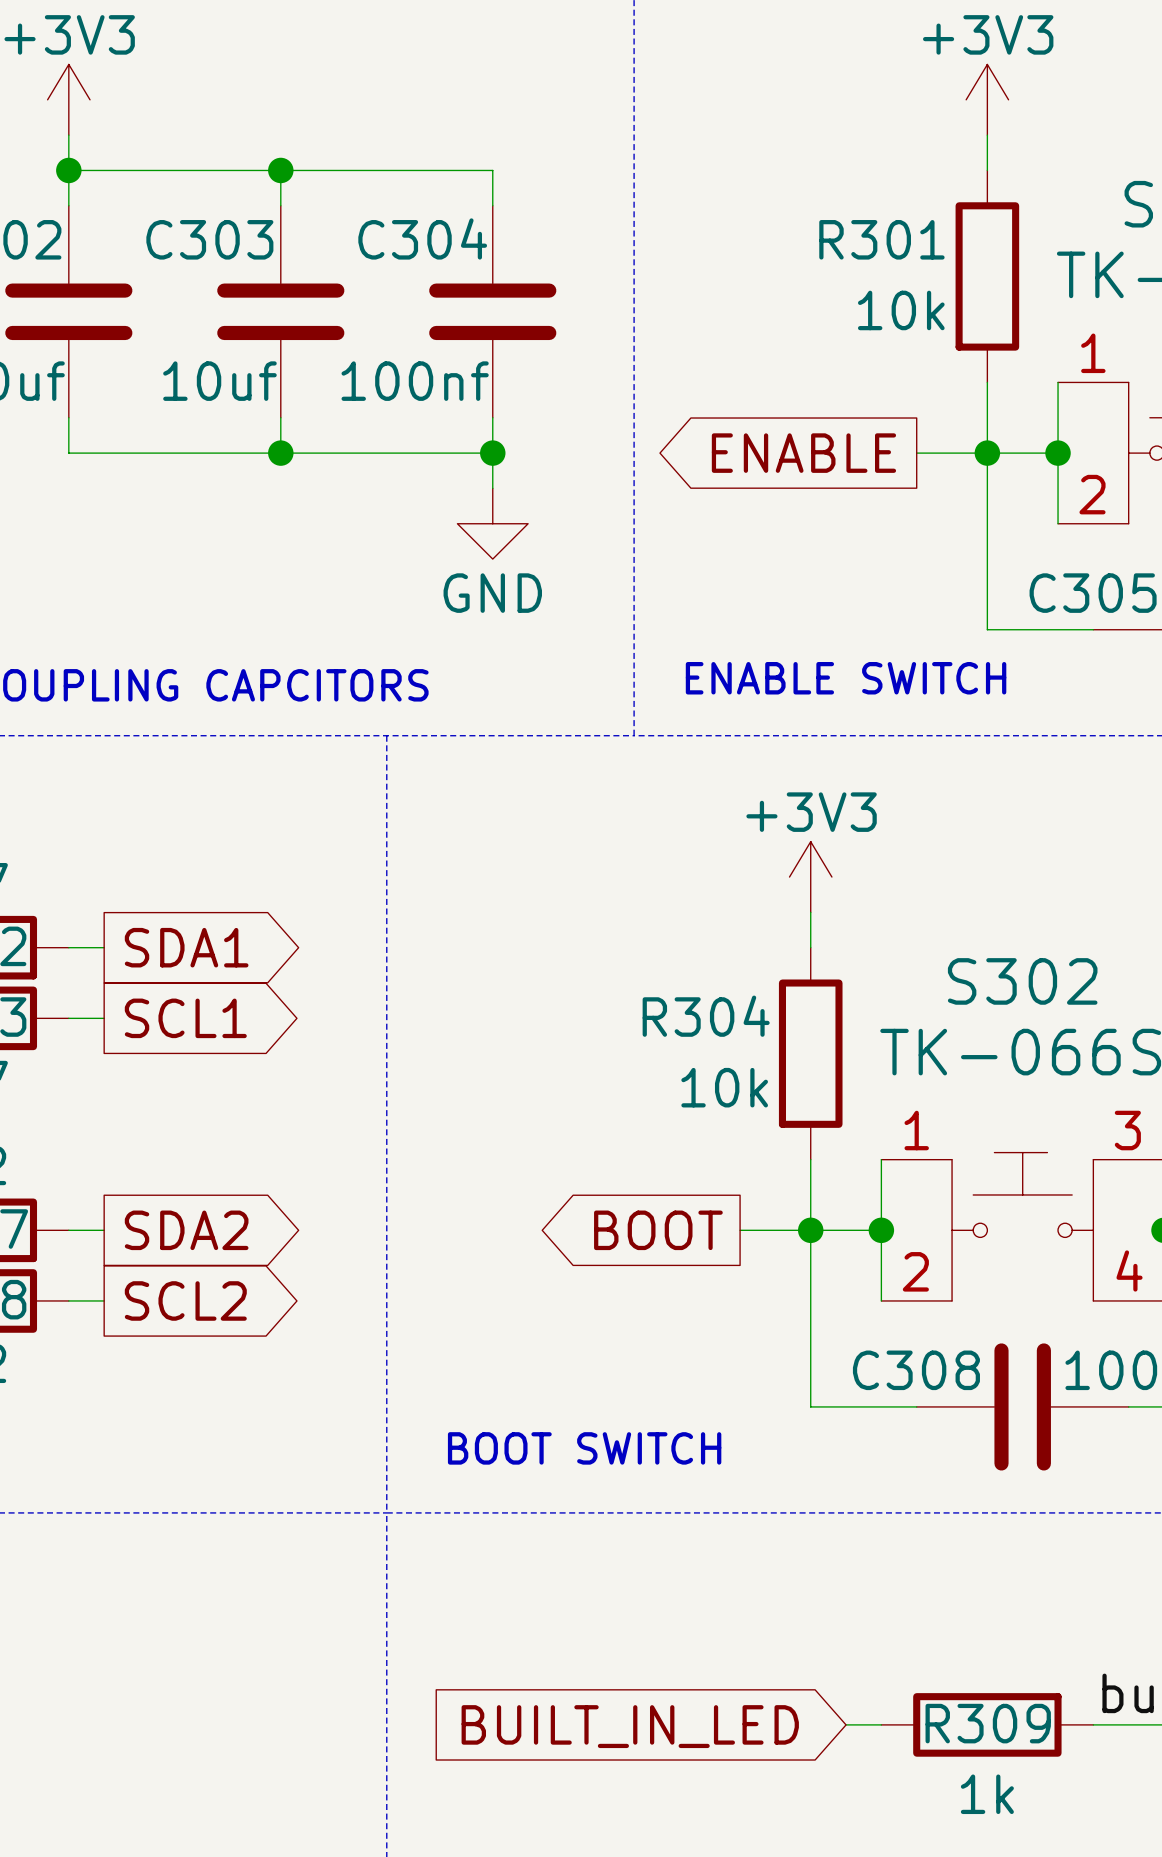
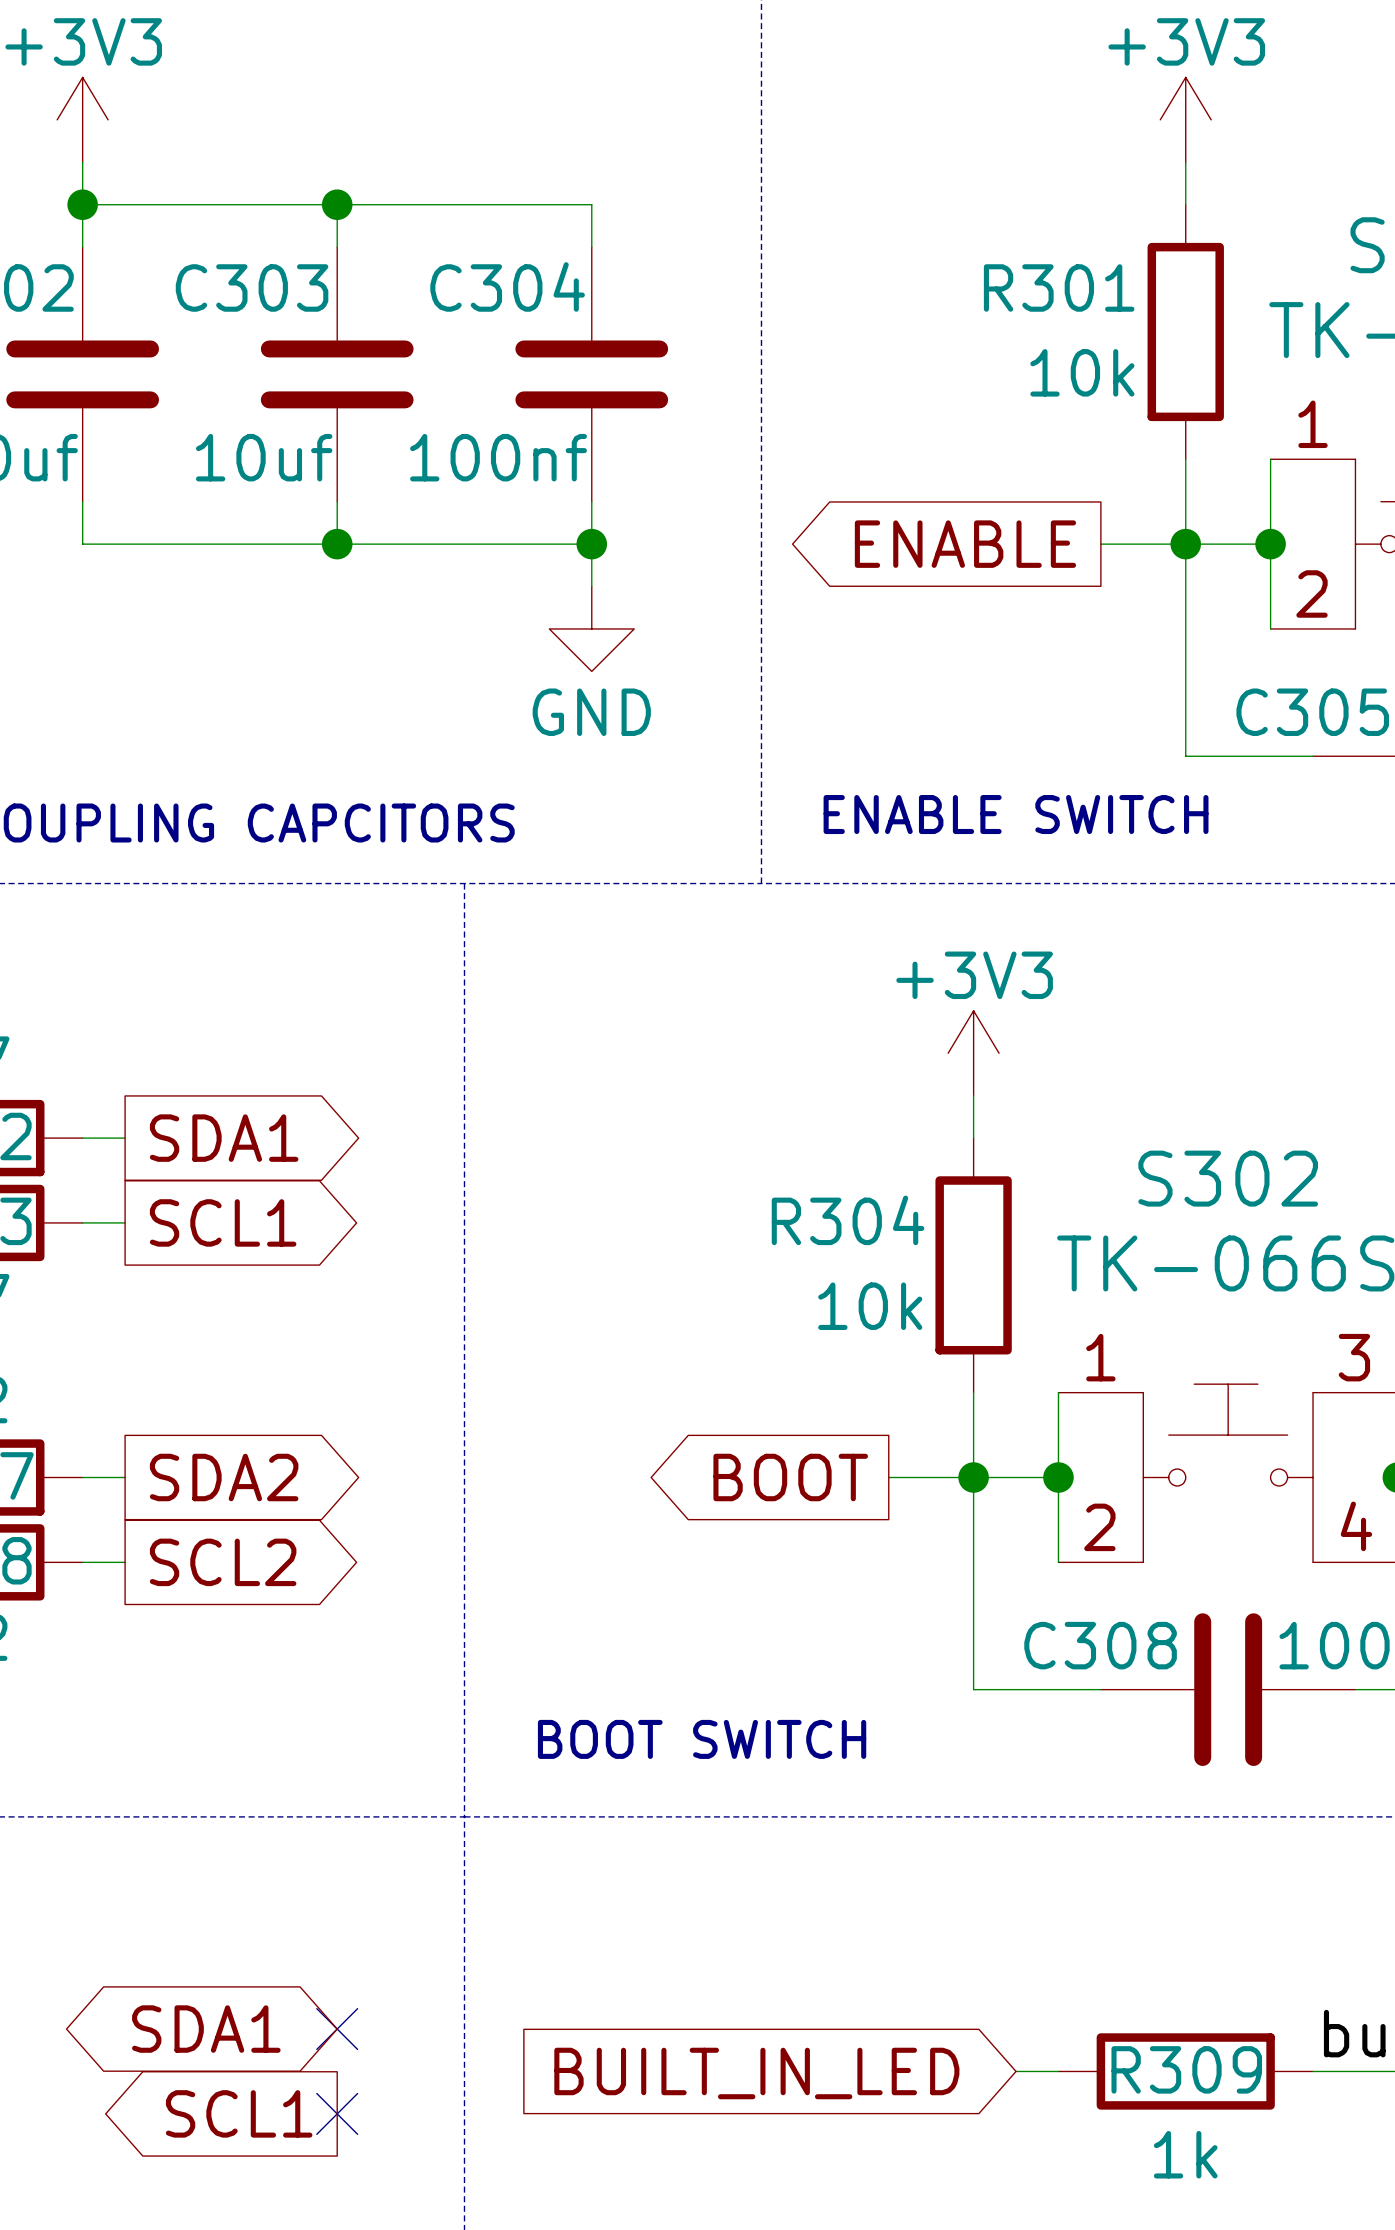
global label: none -> SDA1 (206, 2029)
no-connect mark: none -> (337, 2029)
global label: none -> SCL1 (239, 2113)
no-connect mark: none -> (337, 2113)

